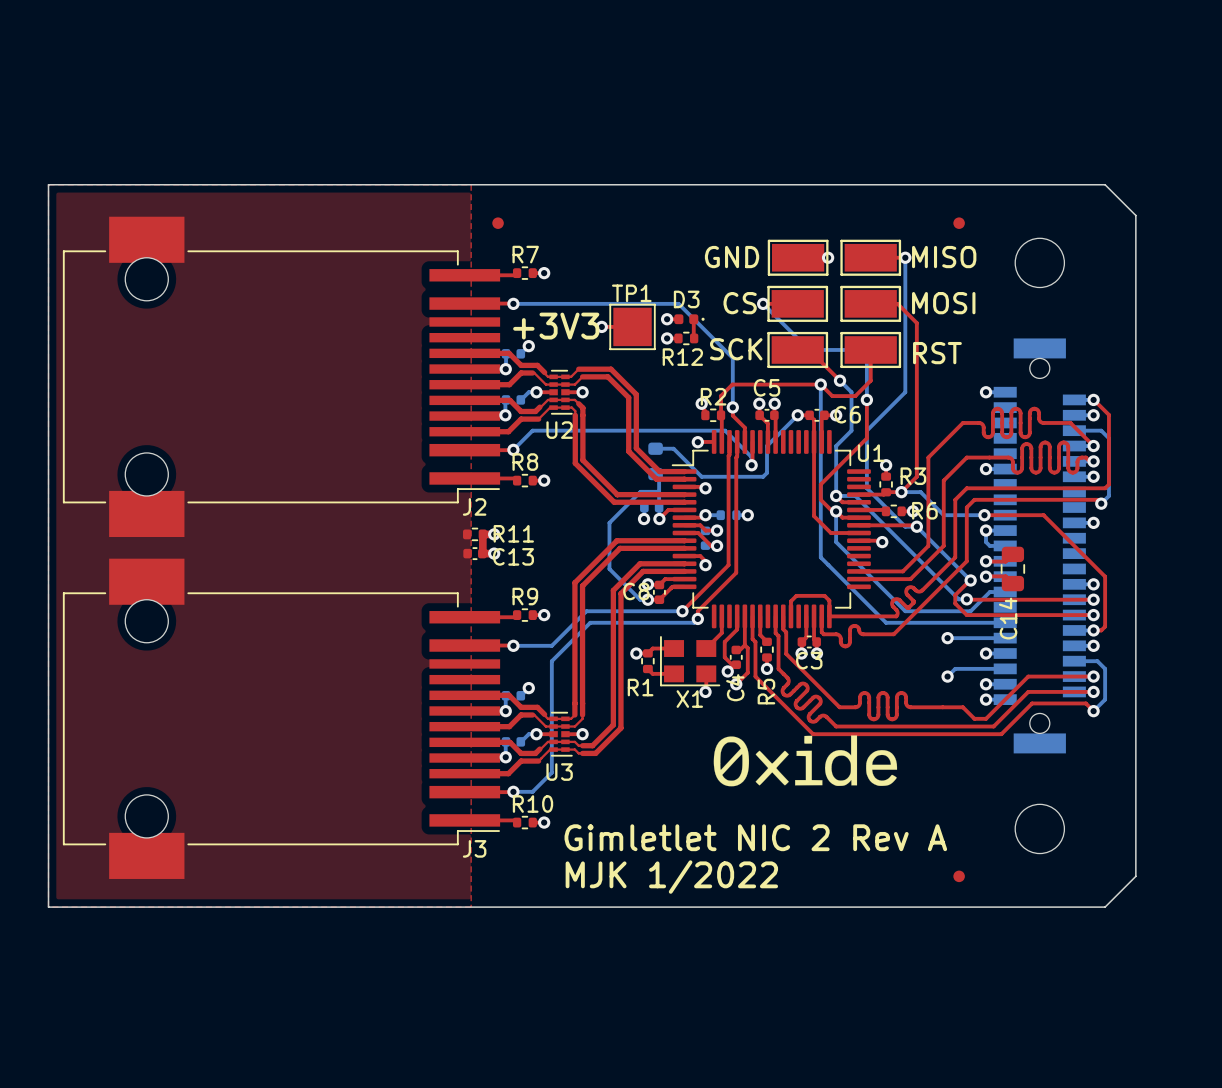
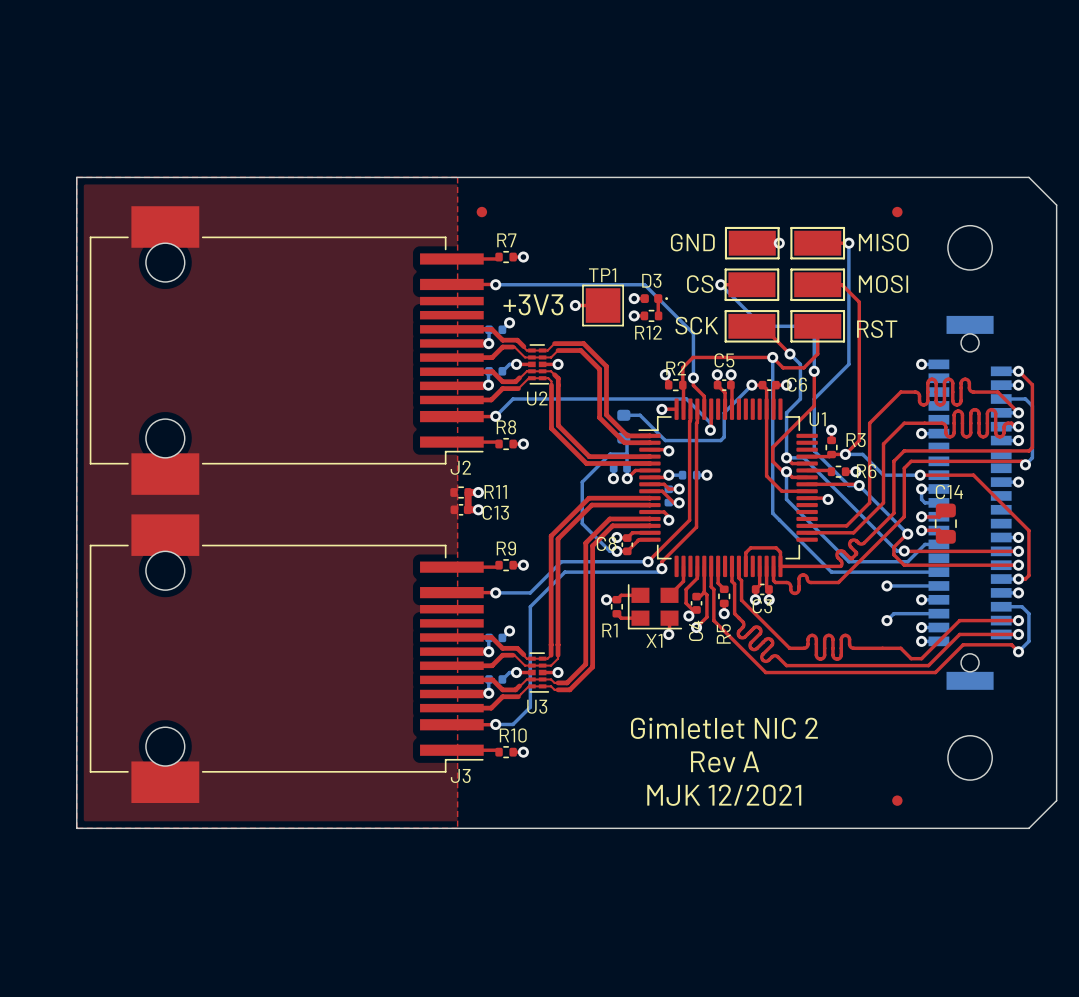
C14 name rotation: 0° (1008, 618) -> 90° clockwise (949, 491)
C14 name position: C14 (1008, 618) -> C14 (949, 491)
drawing: [713, 735, 898, 787] -> none
text: none -> Rev A (725, 761)
text: Gimletlet NIC 2 Rev A (755, 837) -> Gimletlet NIC 2 (724, 728)
text: MJK 1/2022 (671, 877) -> MJK 12/2021 (724, 795)

